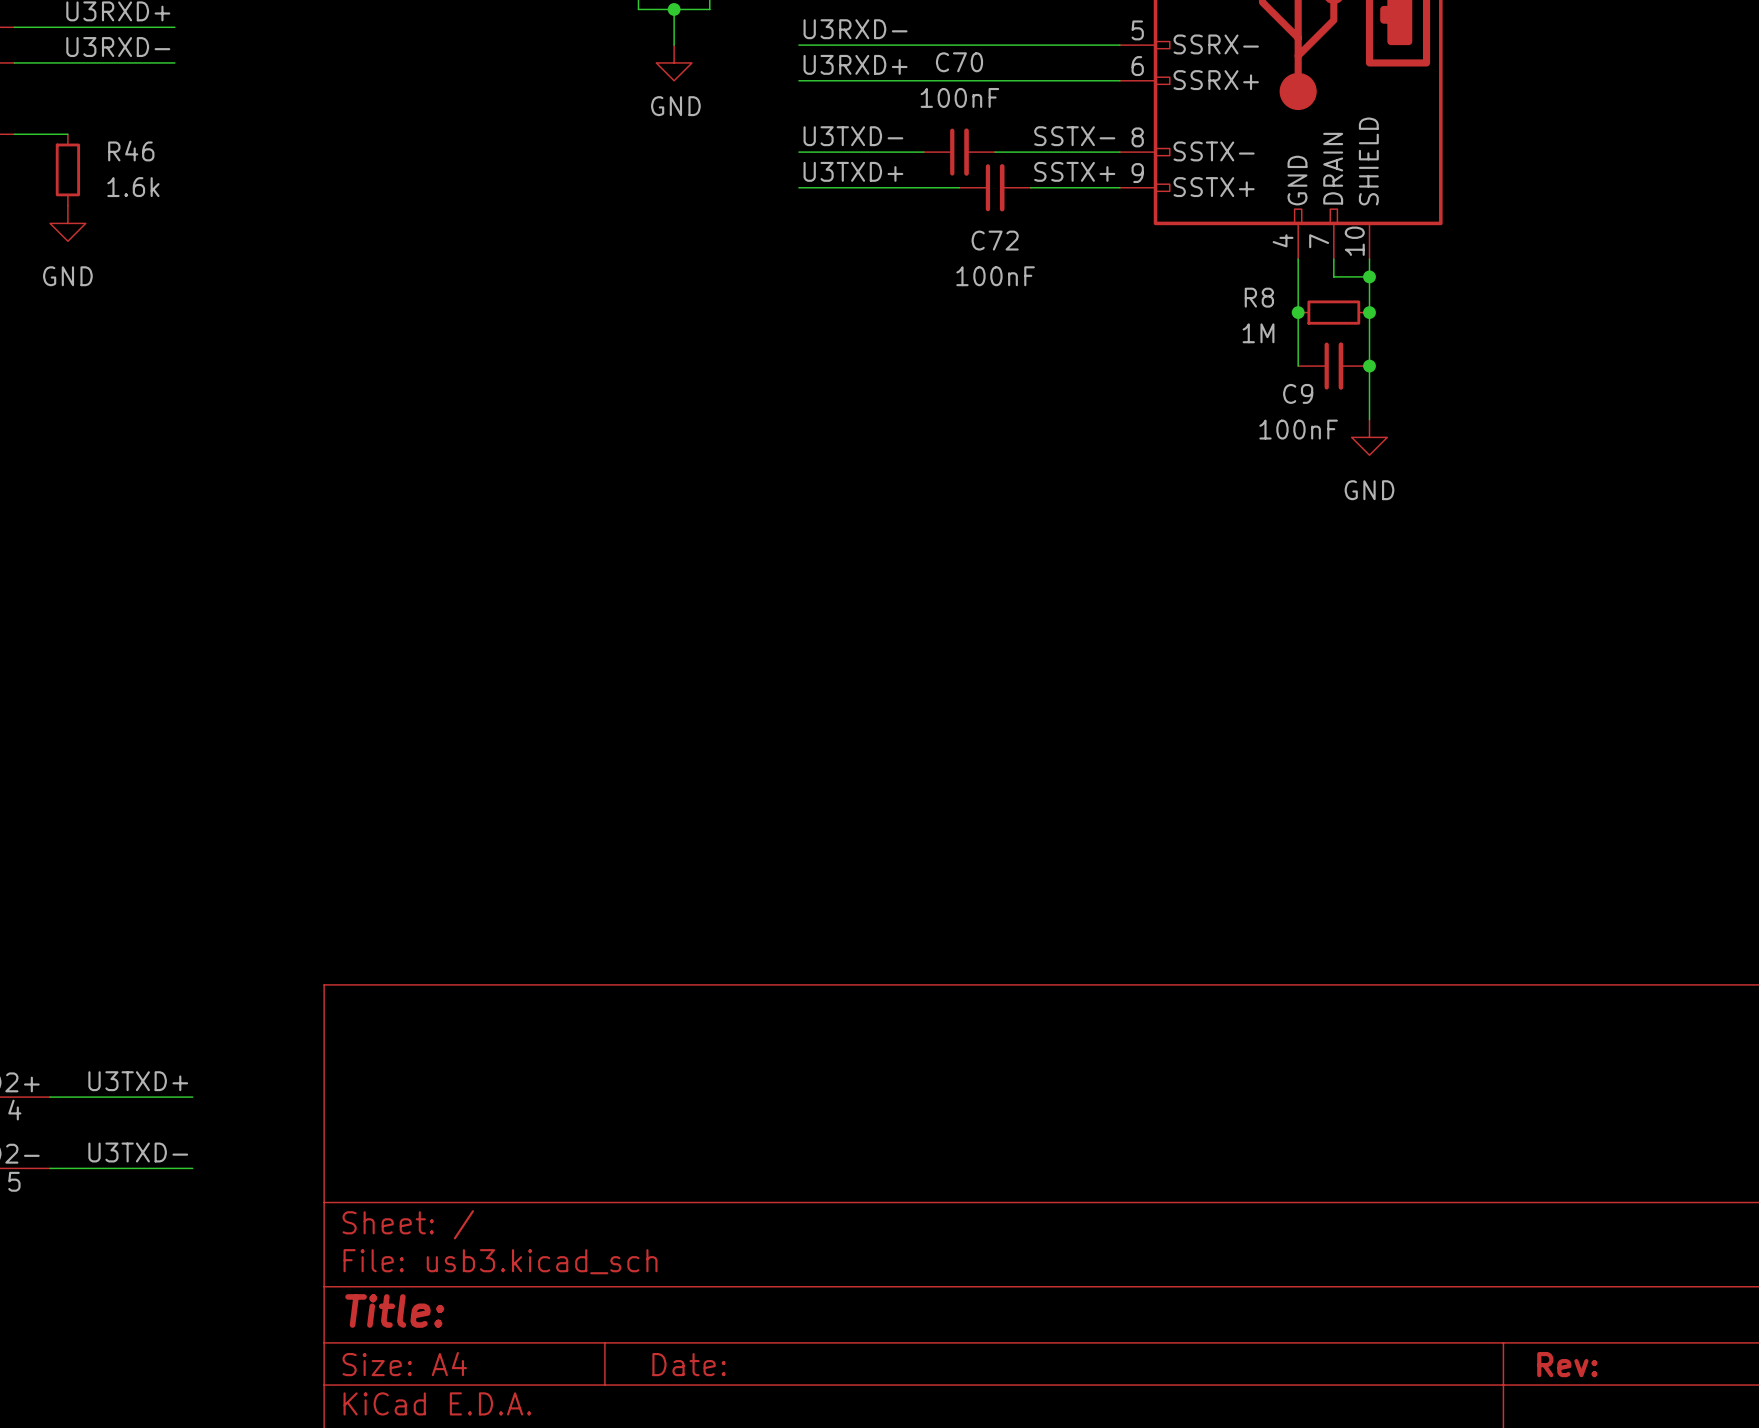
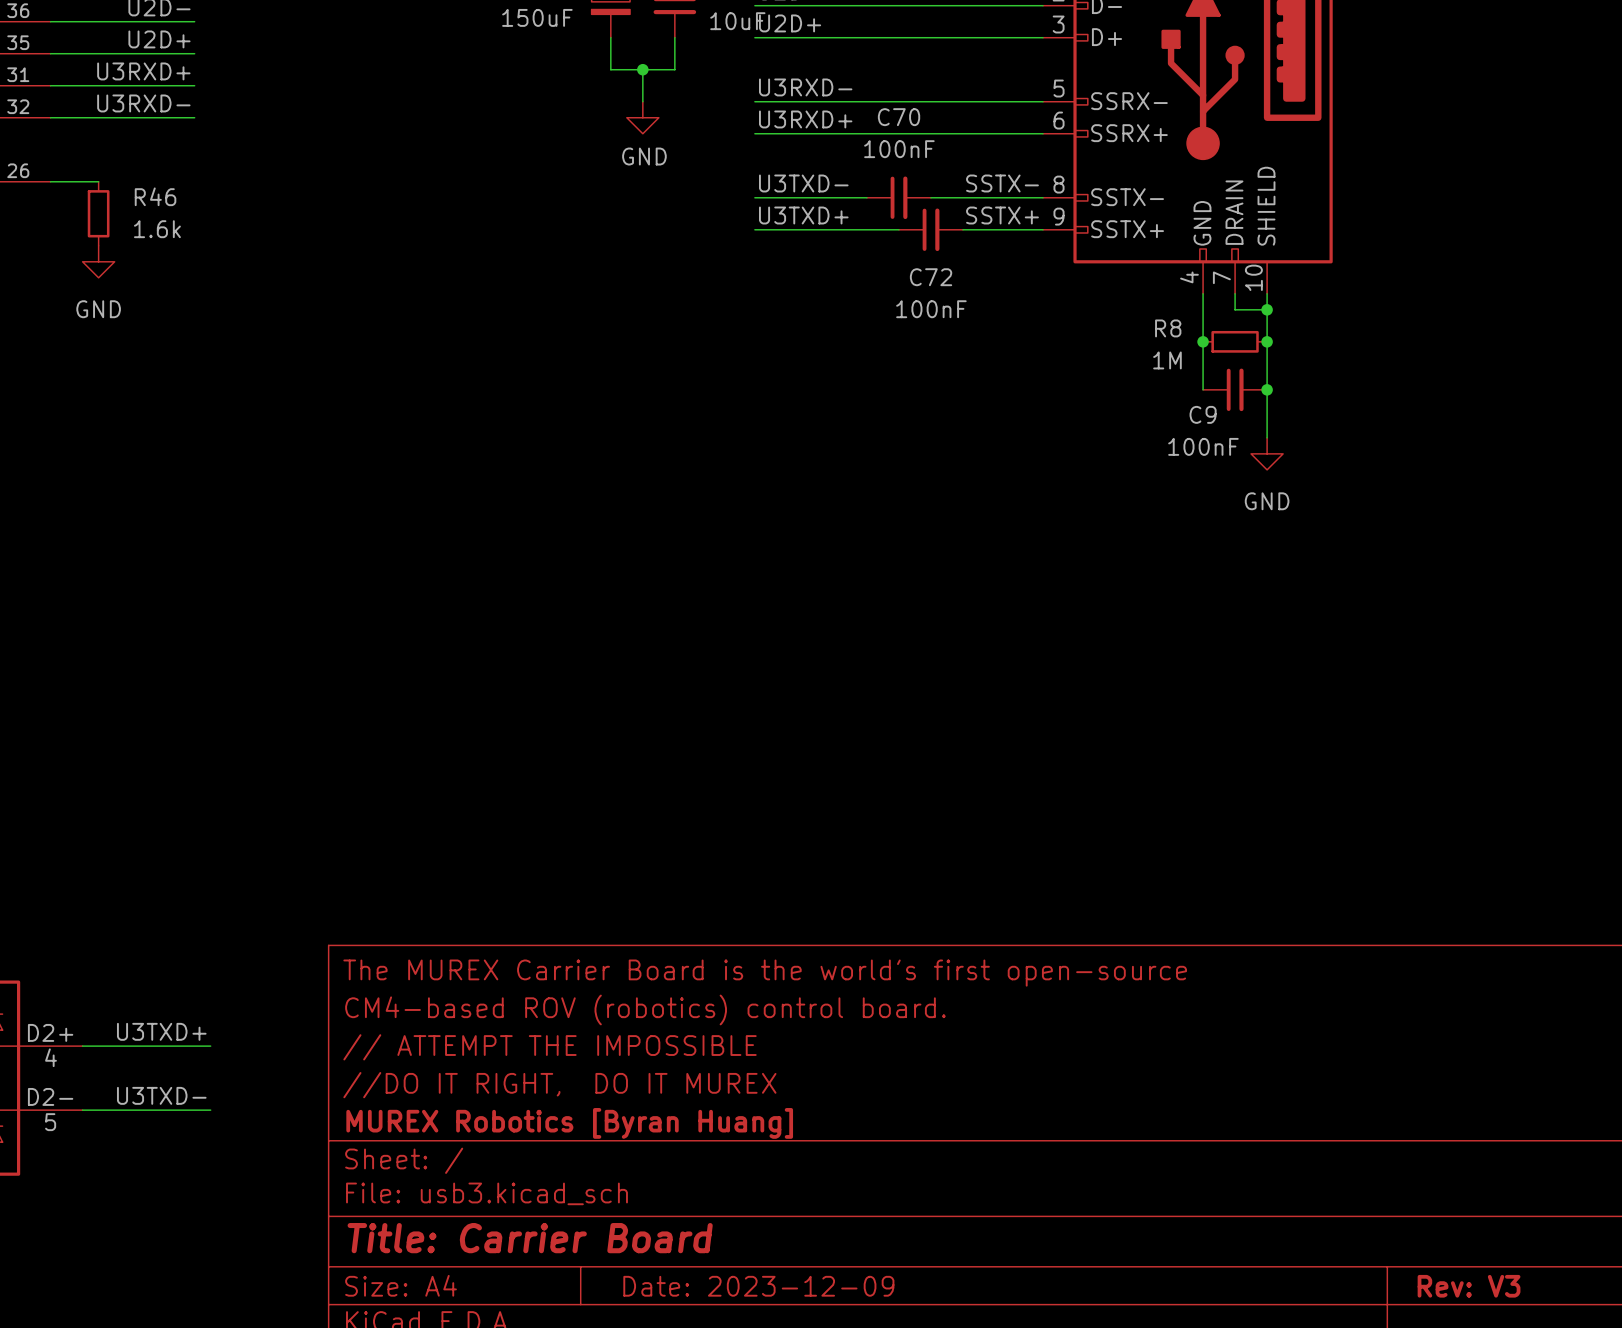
title block: none -> The MUREX Carrier Board is the world's first open-source (765, 973)
title block: none -> CM4-based ROV (robotics) control board. (645, 1009)
title block: none -> // ATTEMPT THE IMPOSSIBLE (550, 1047)
title block: none -> //DO IT RIGHT, DO IT MUREX (559, 1085)
title block: none -> MUREX Robotics [Byran Huang] (569, 1123)
title block: Title: (394, 1310) -> Title: Carrier Board (530, 1238)
title block: Date: (689, 1364) -> Date: 2023-12-09 (758, 1286)
title block: Rev: (1567, 1364) -> Rev: V3 (1469, 1286)

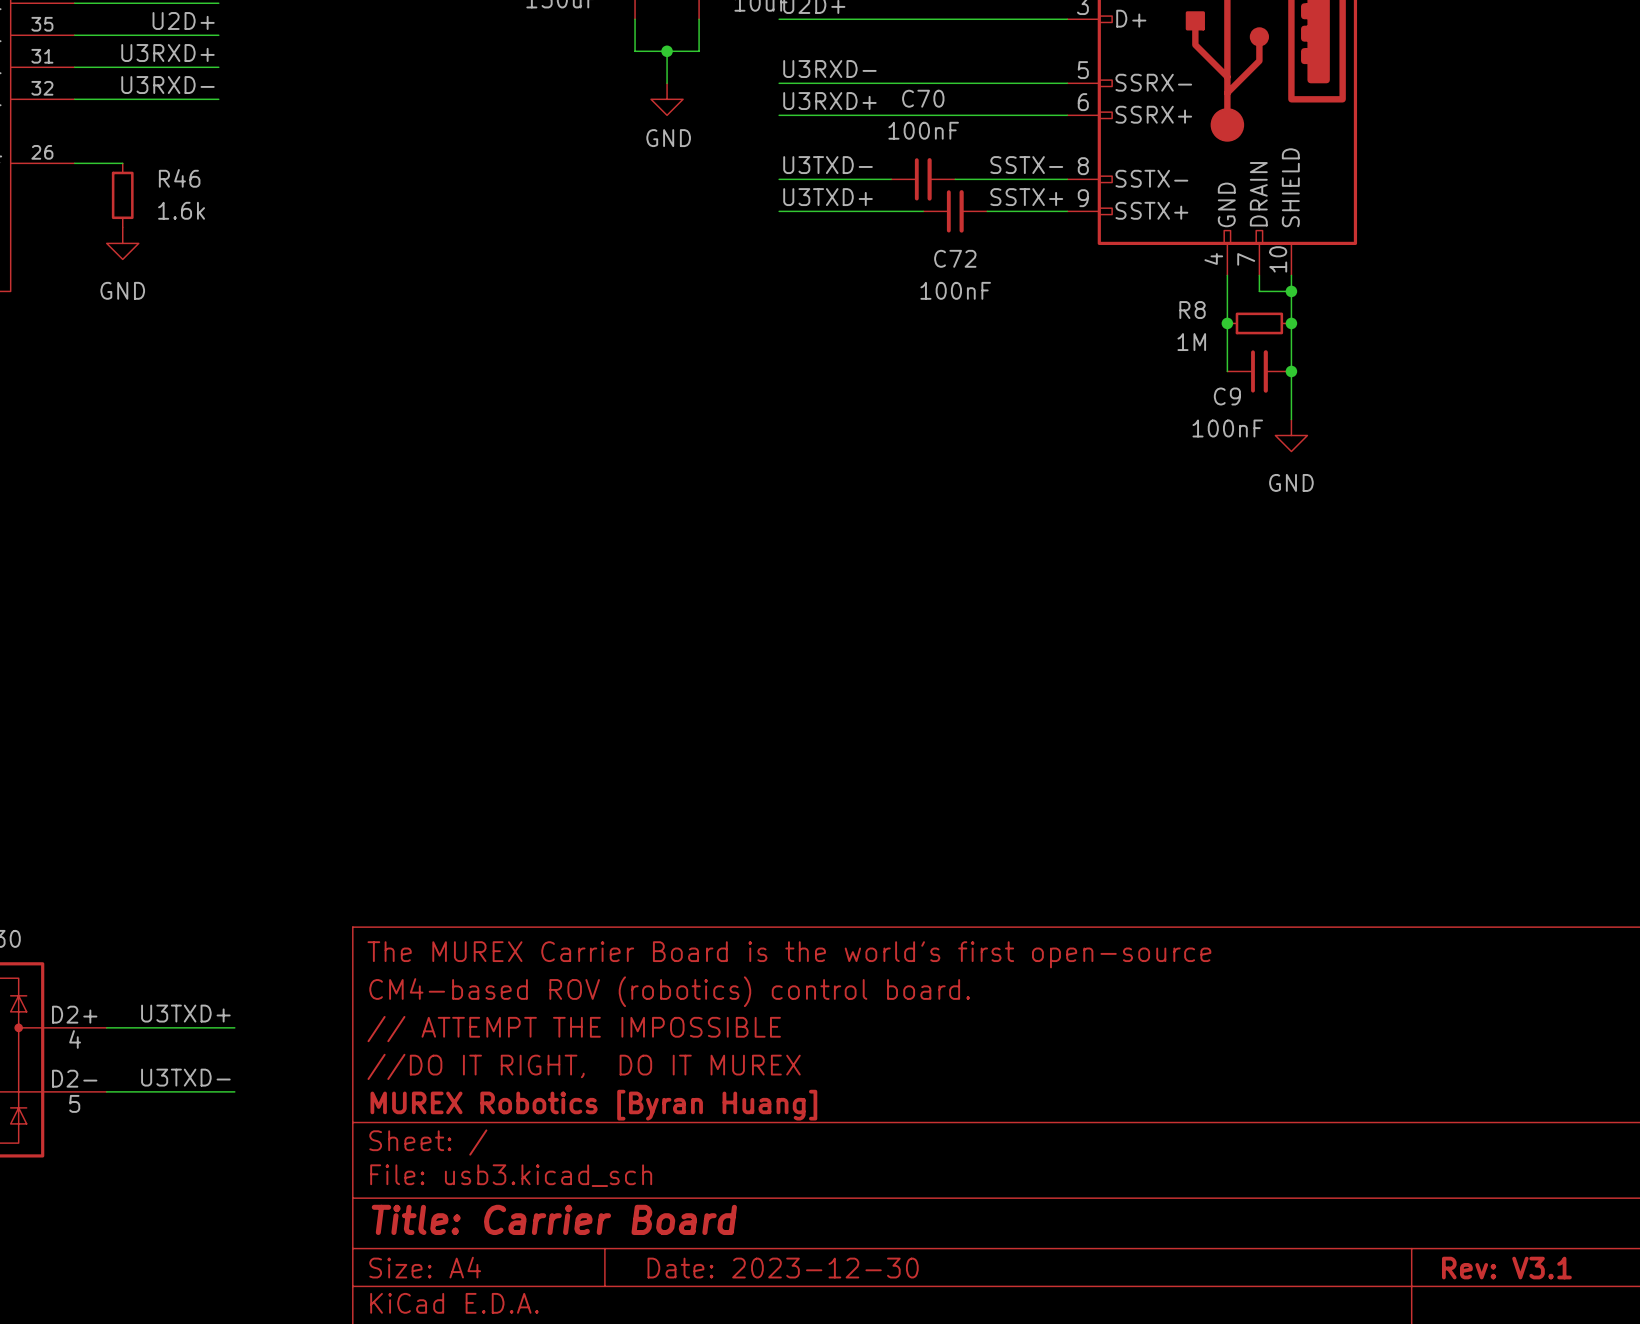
title block: Date: 2023-12-09 (758, 1286) -> Date: 2023-12-30 (783, 1268)
title block: Rev: V3 (1469, 1286) -> Rev: V3.1 (1506, 1268)

